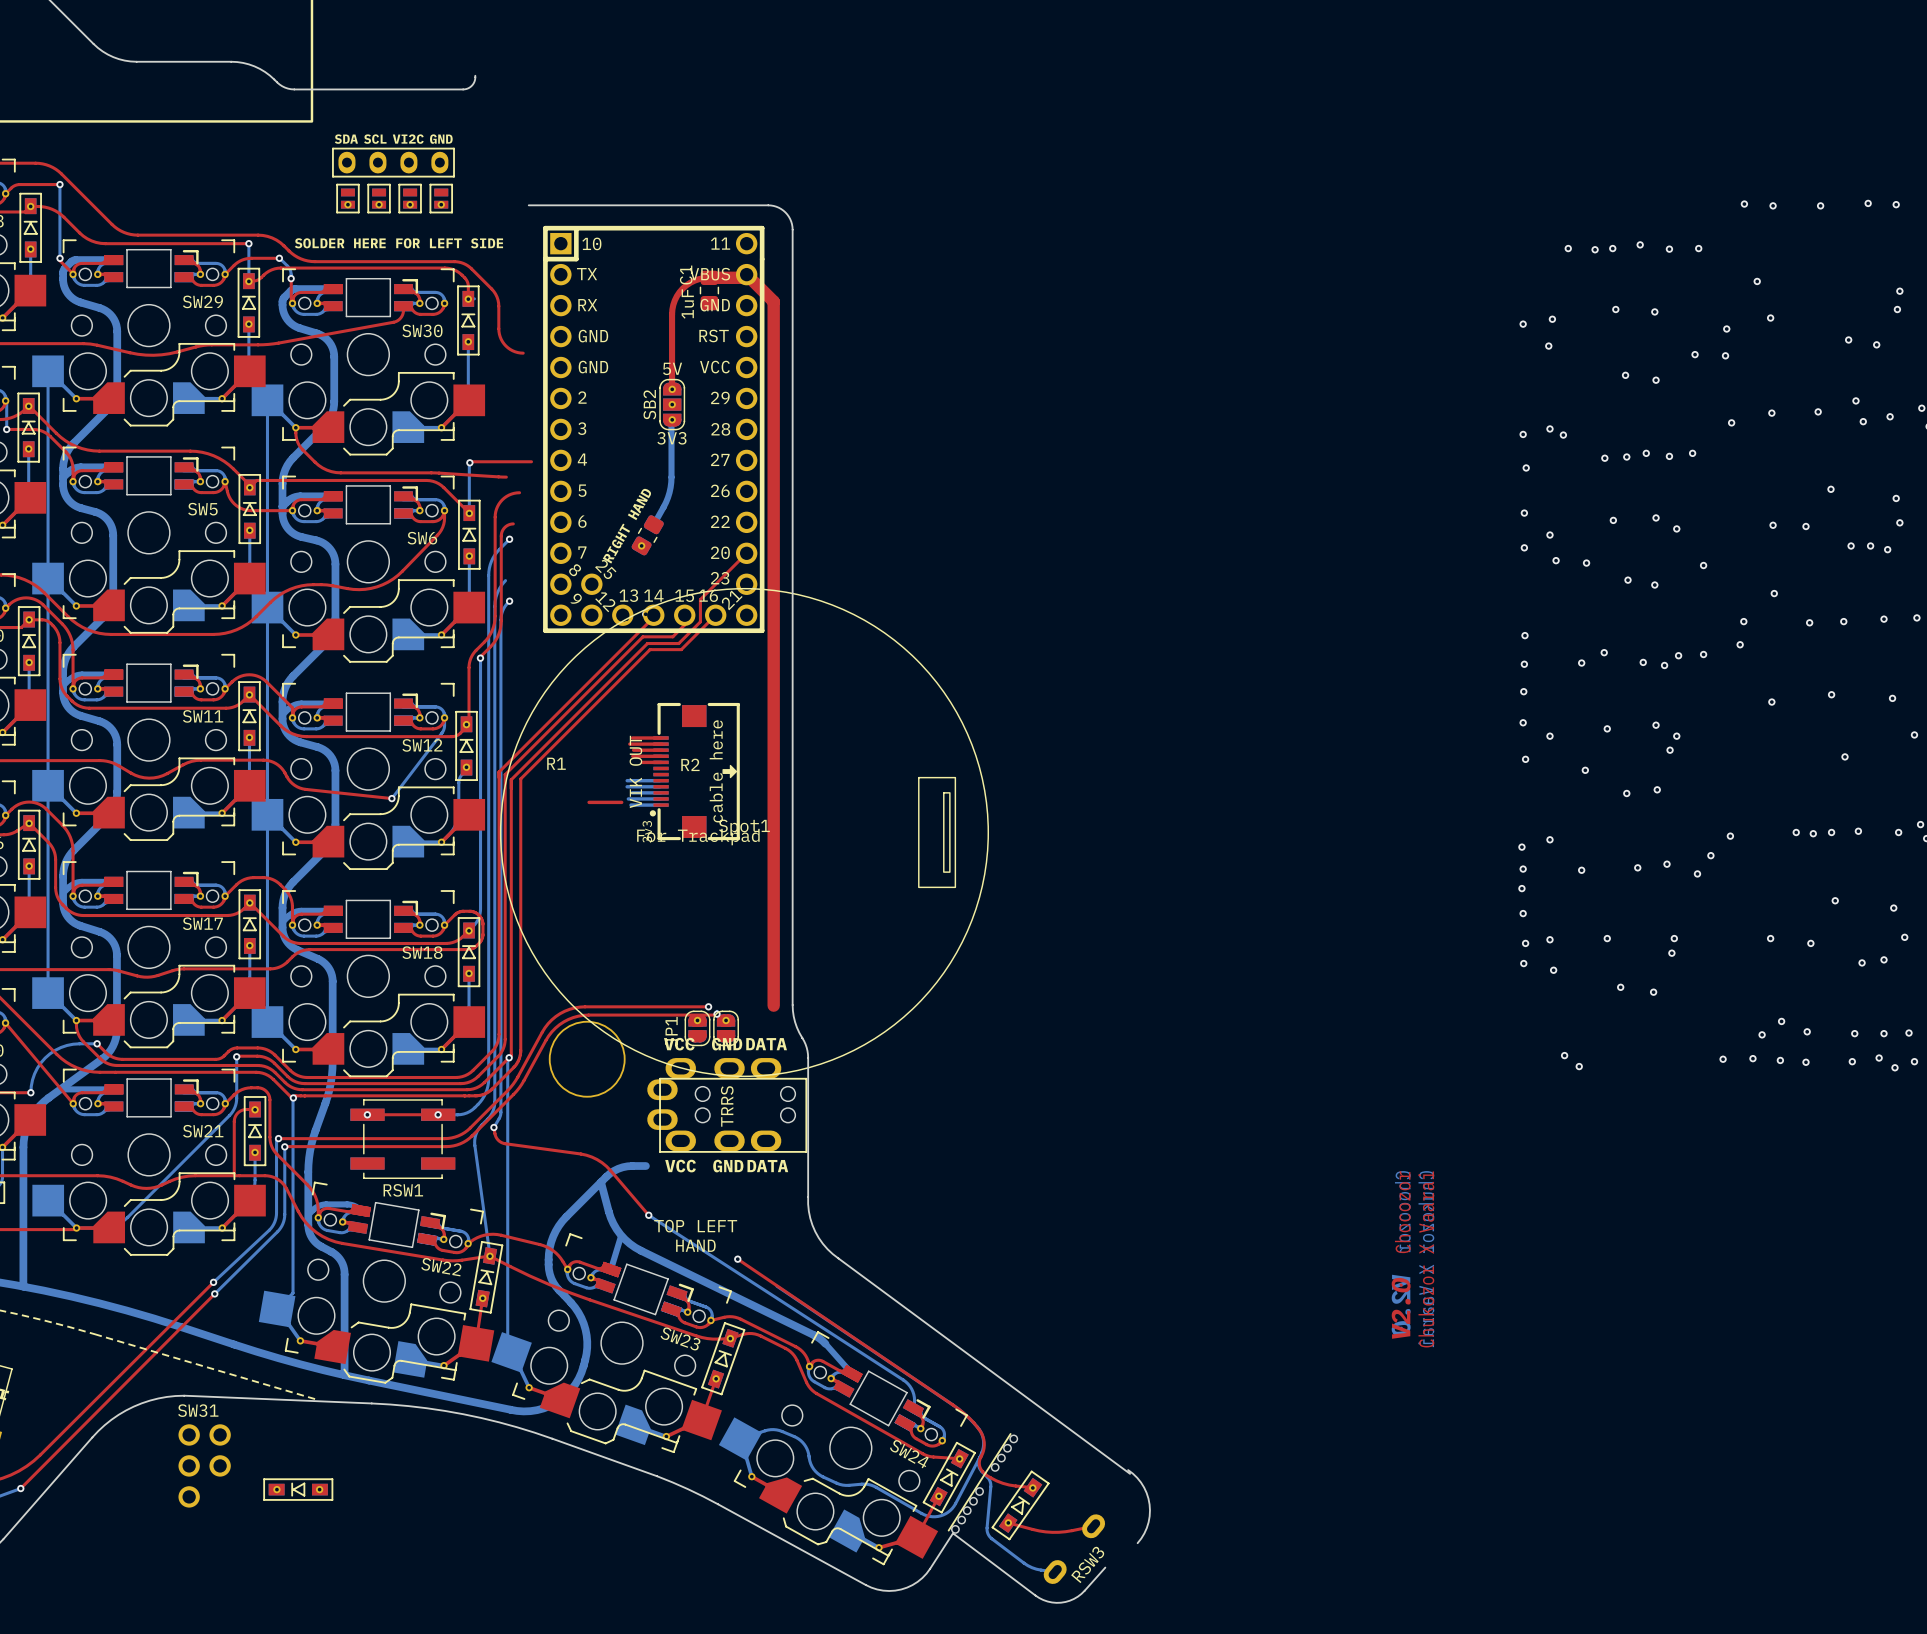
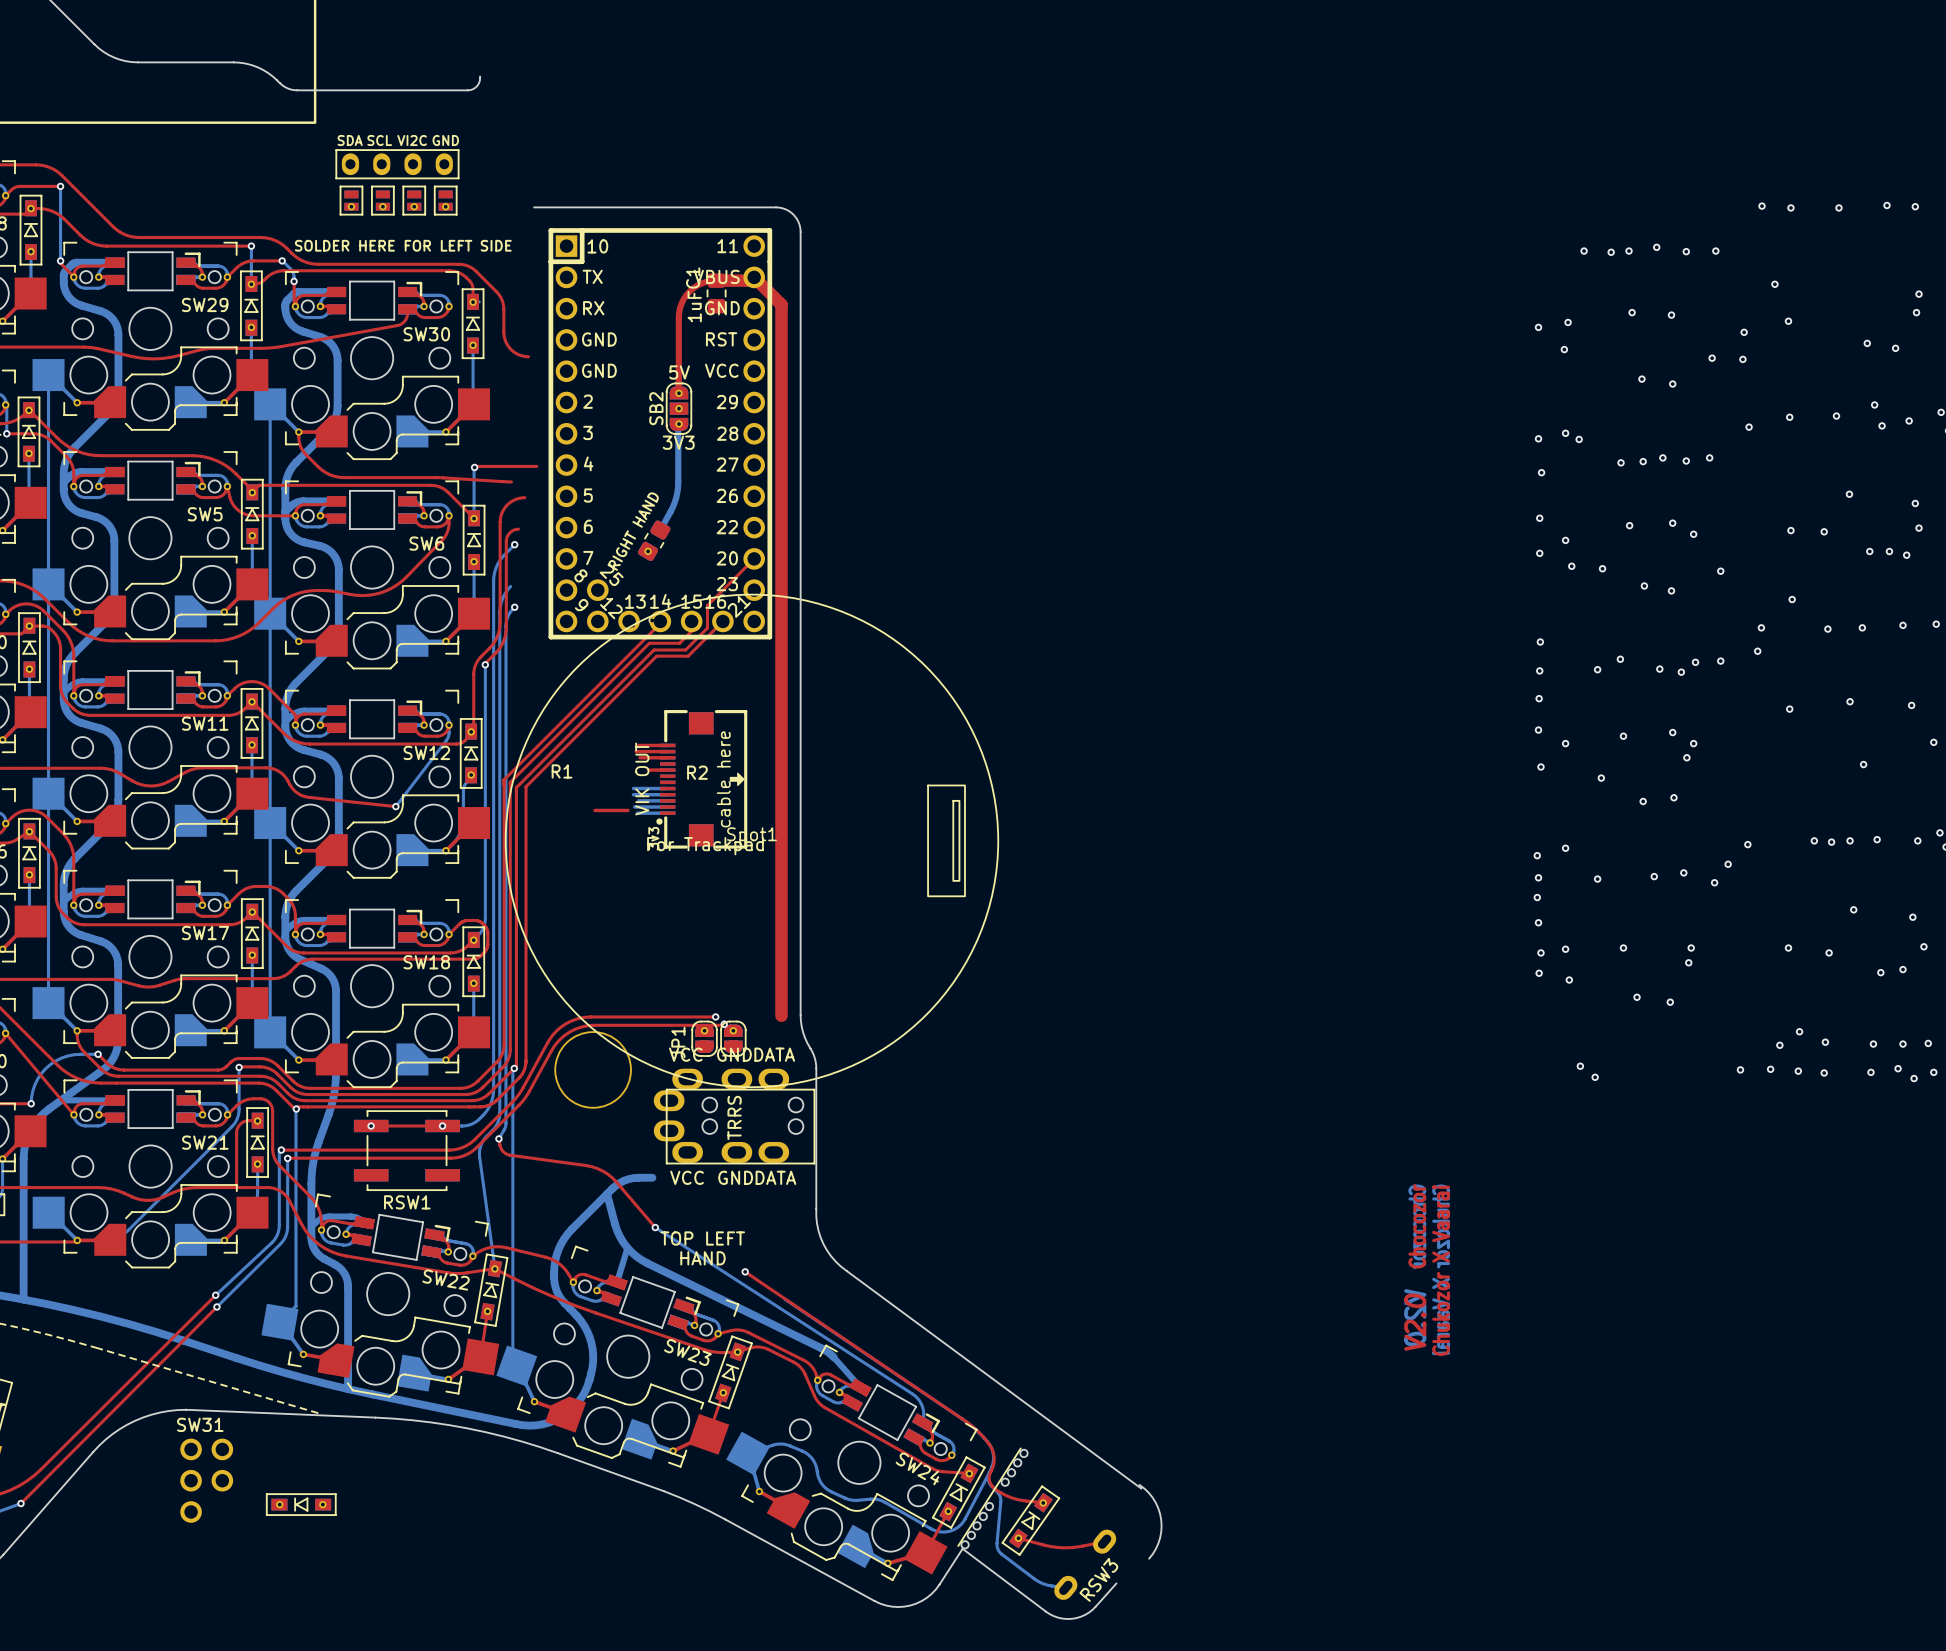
top track: (632, 756) (661, 756) -> none

